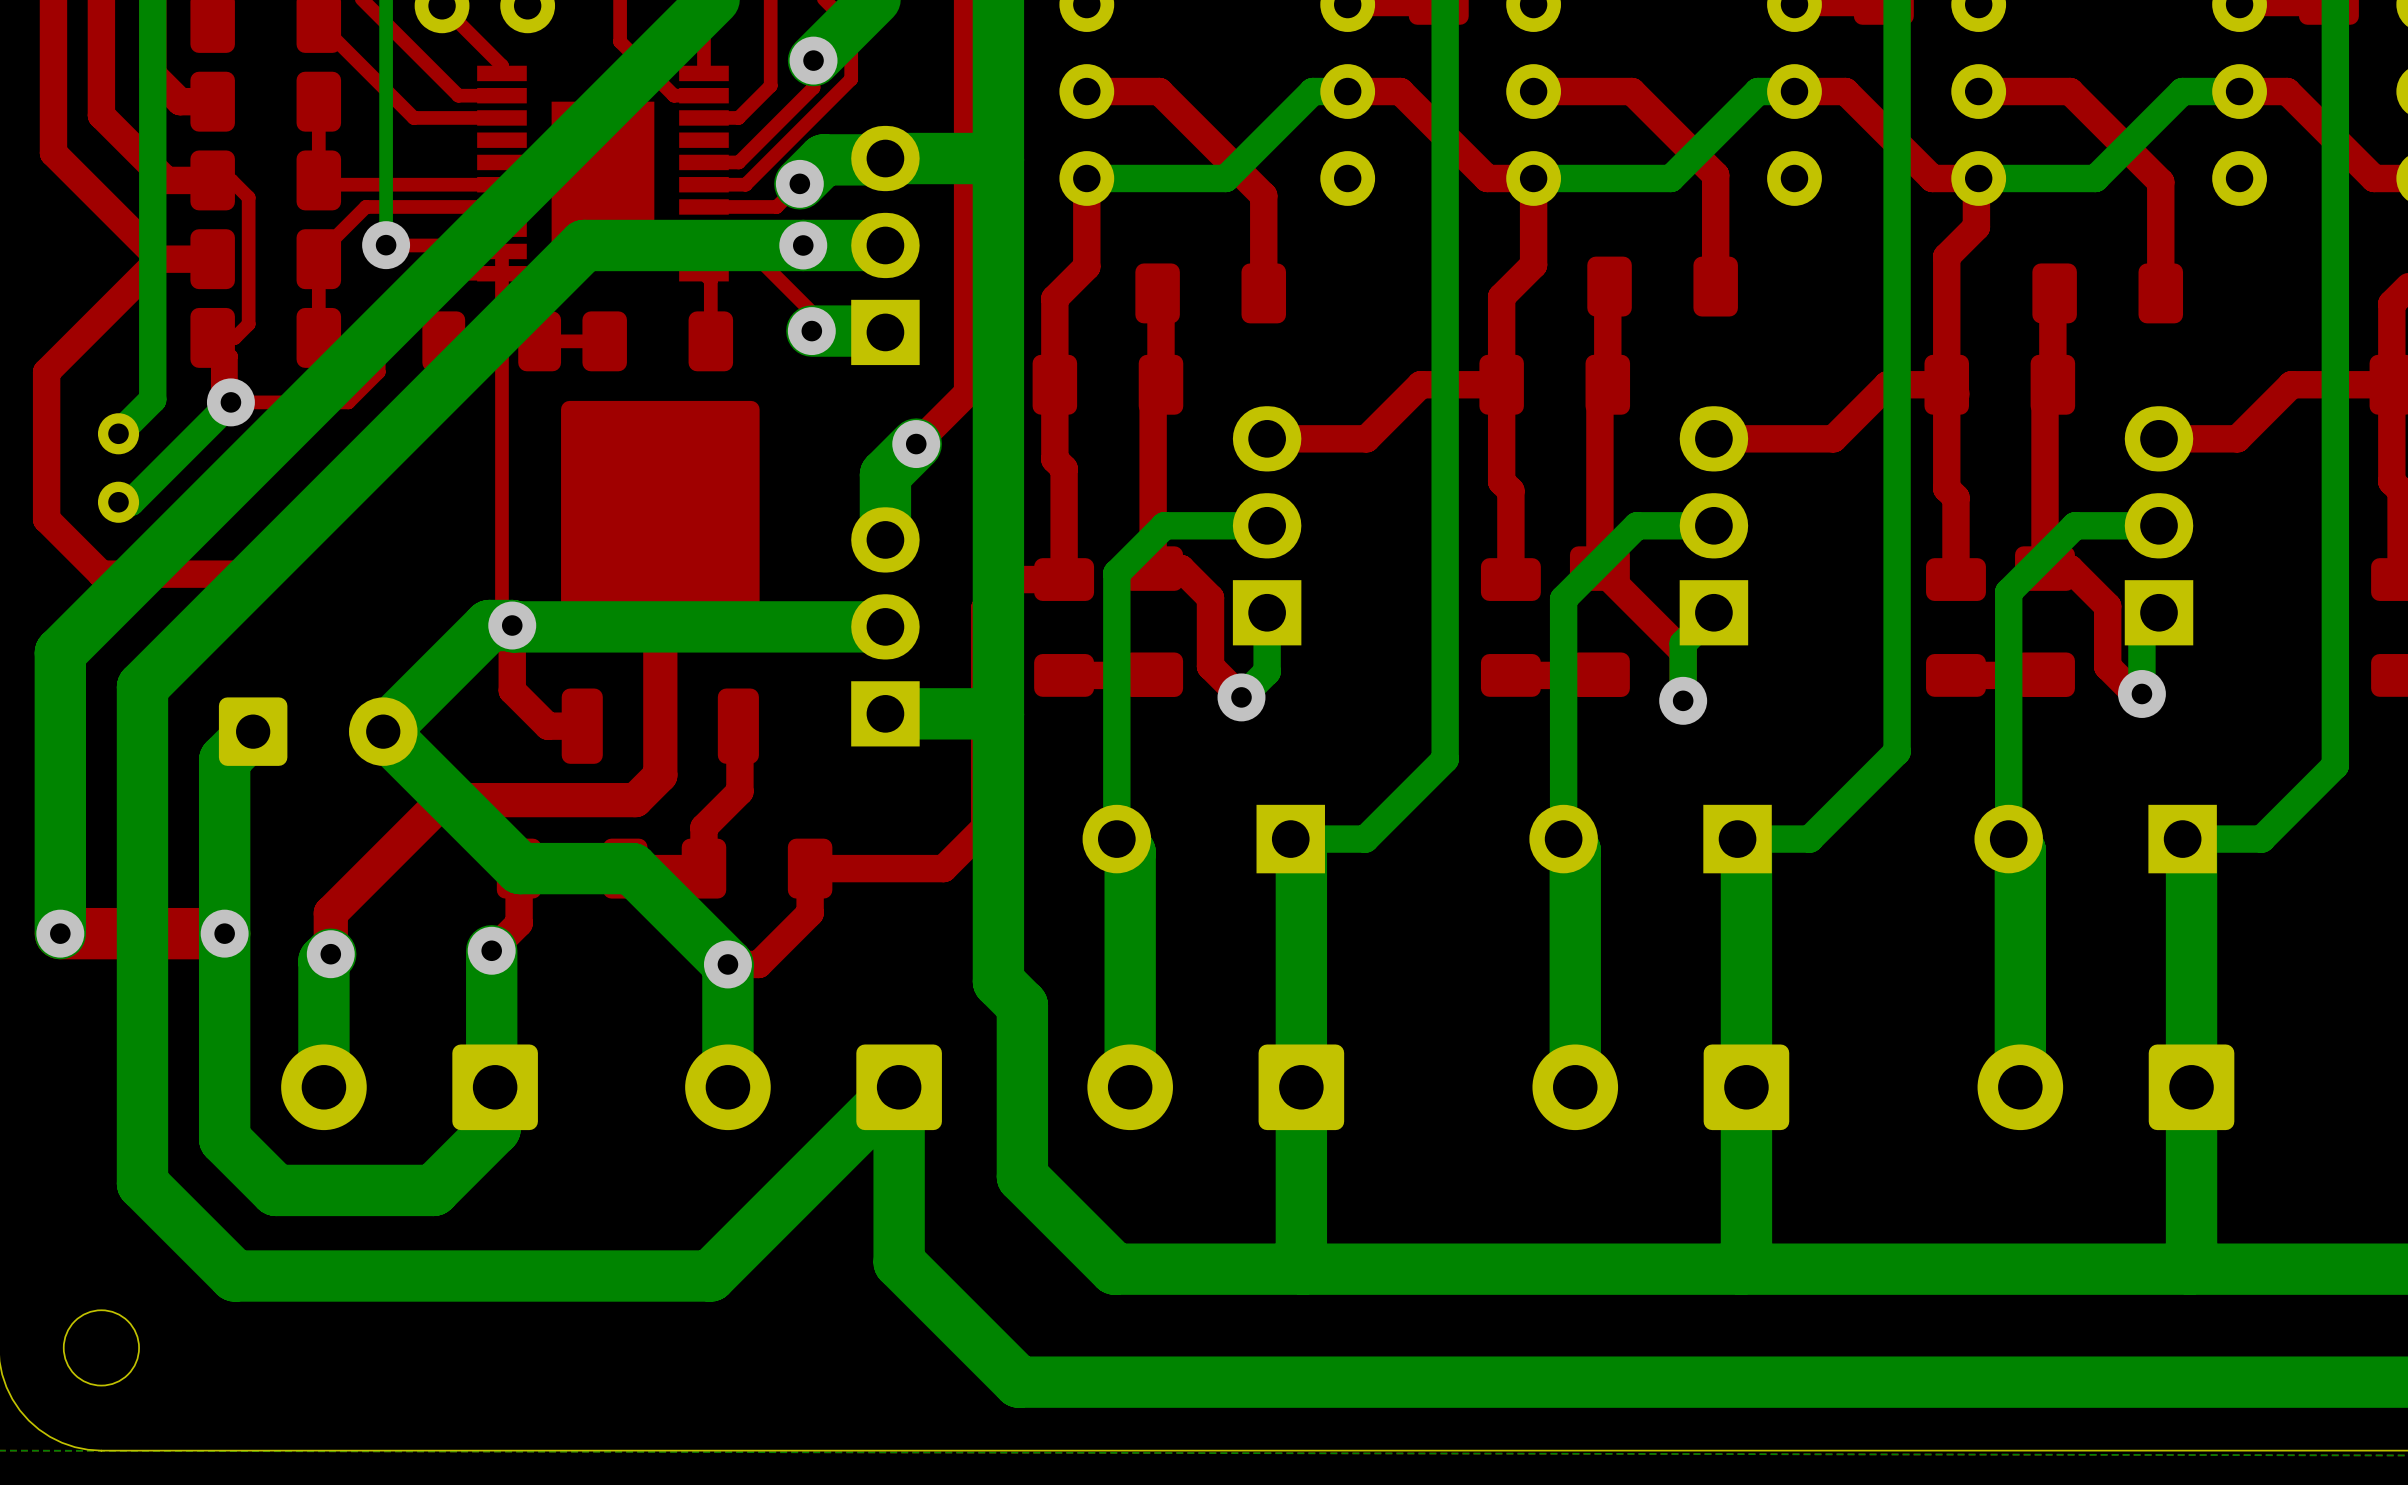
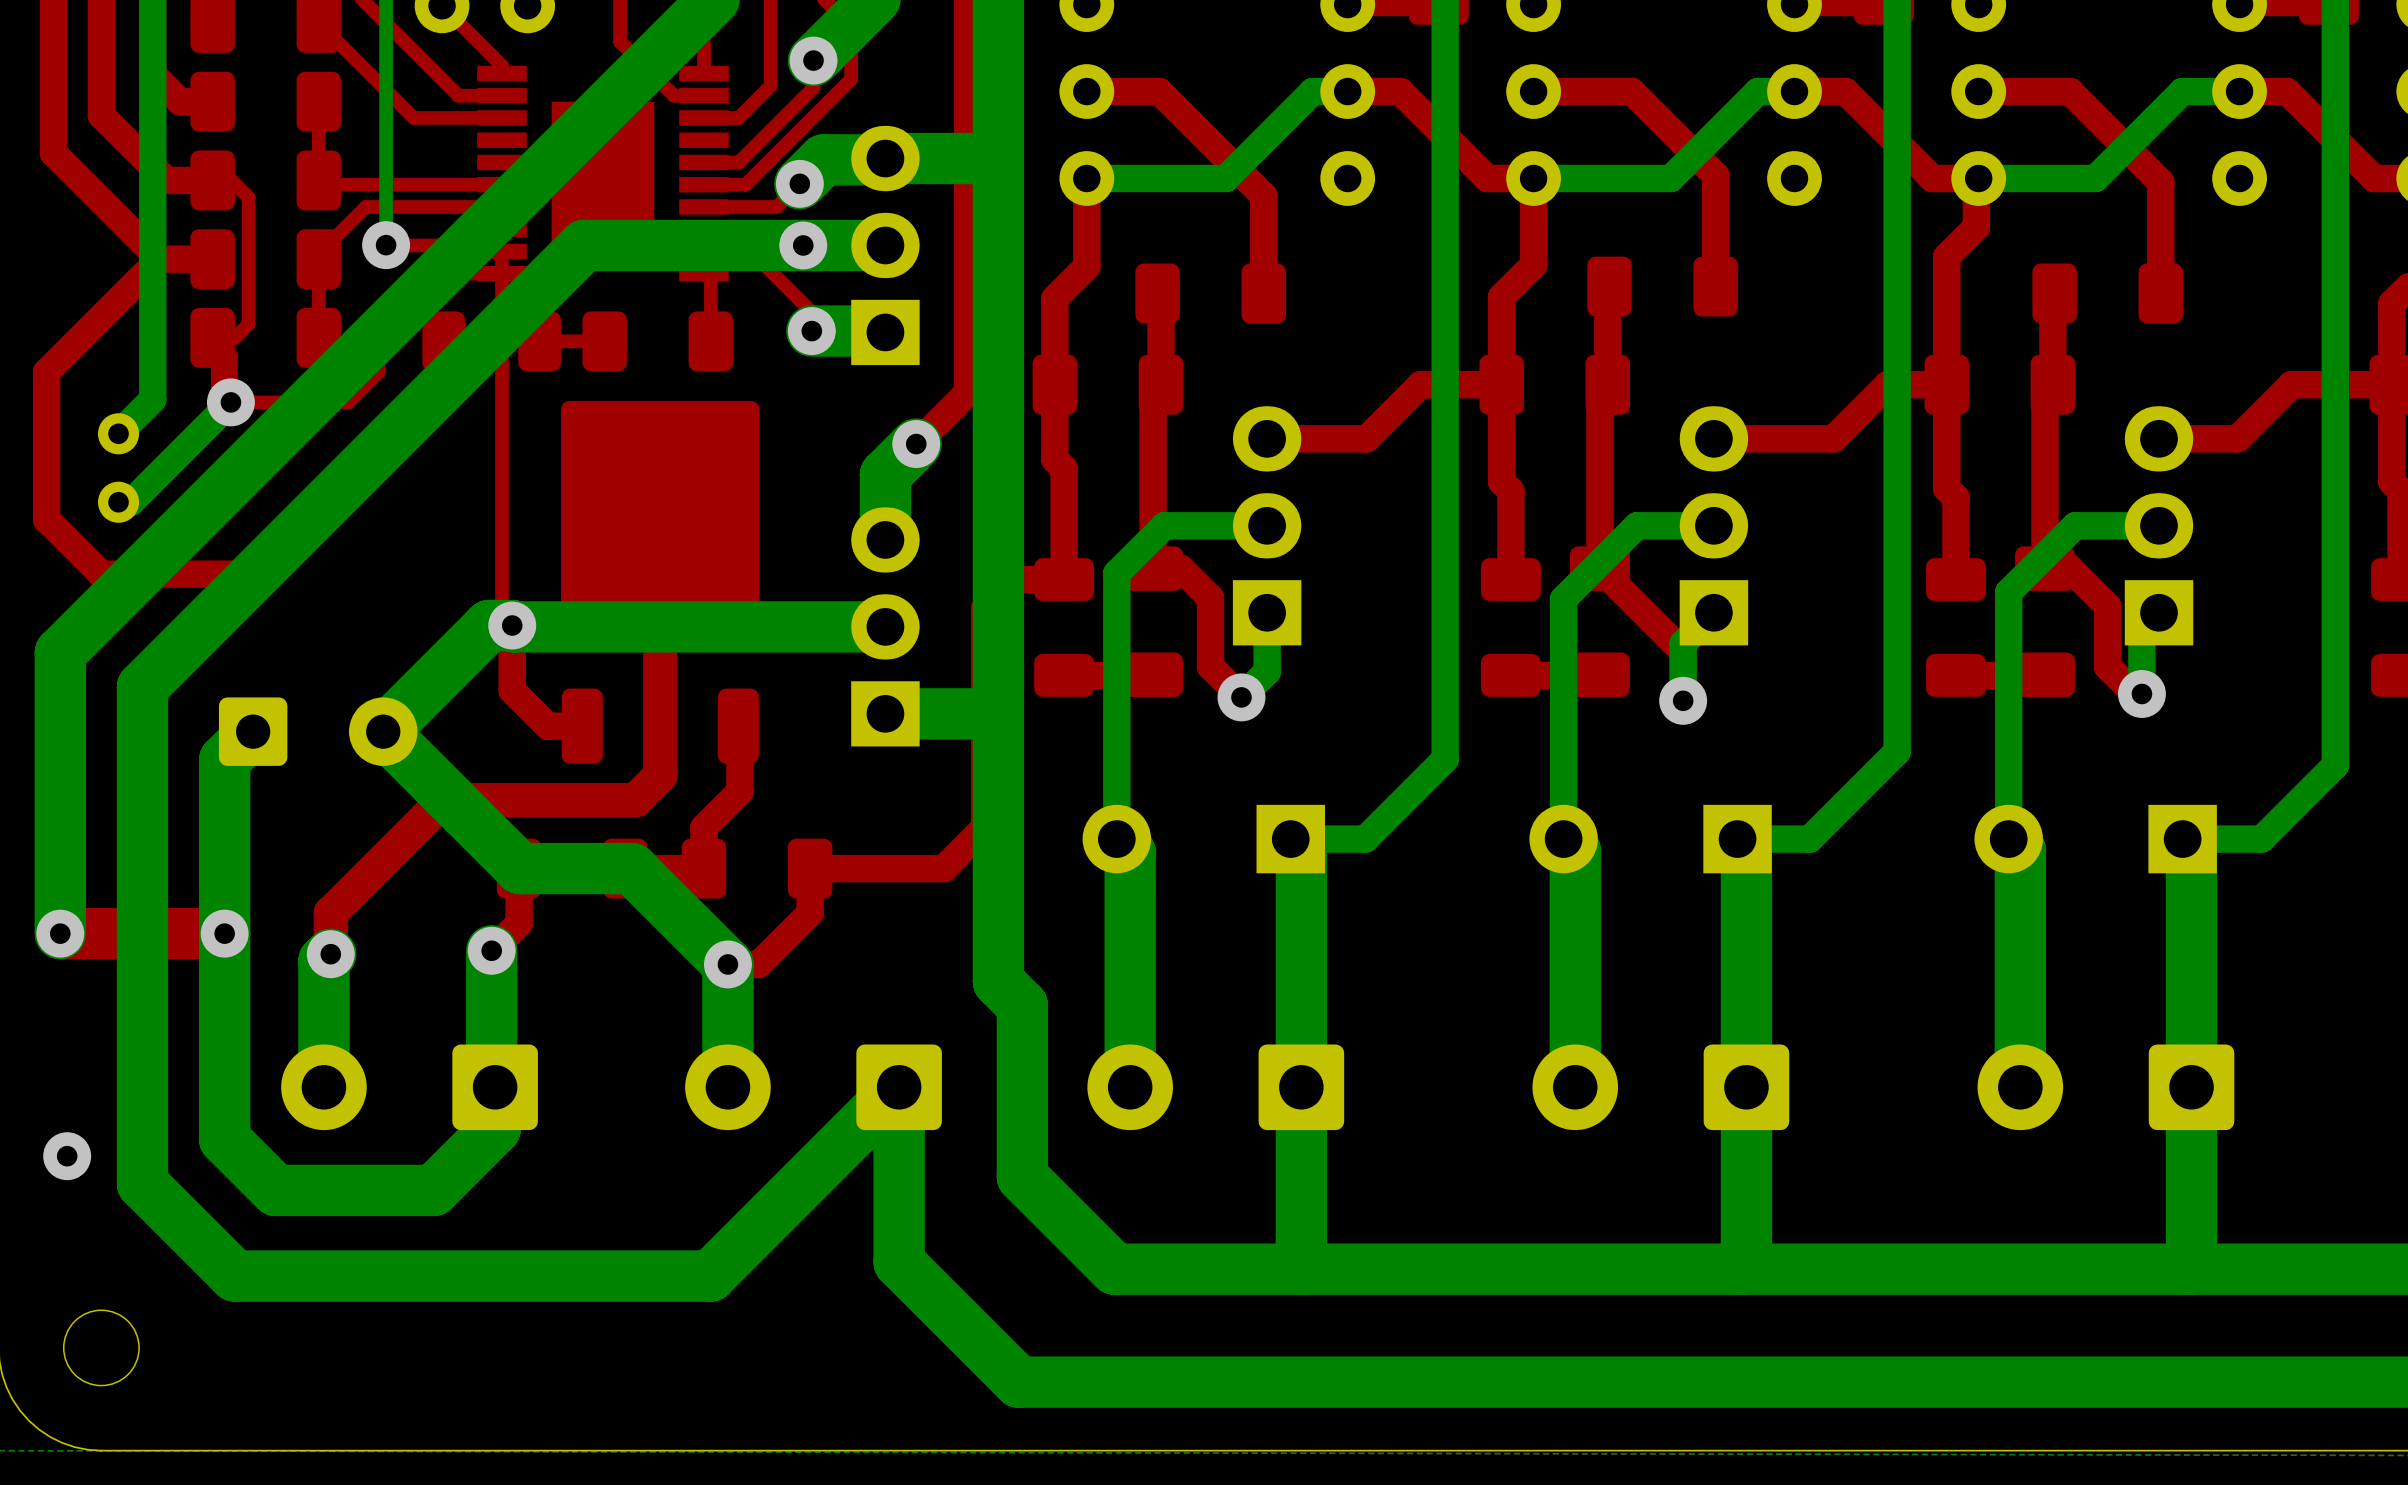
via: none -> (67, 1156)

